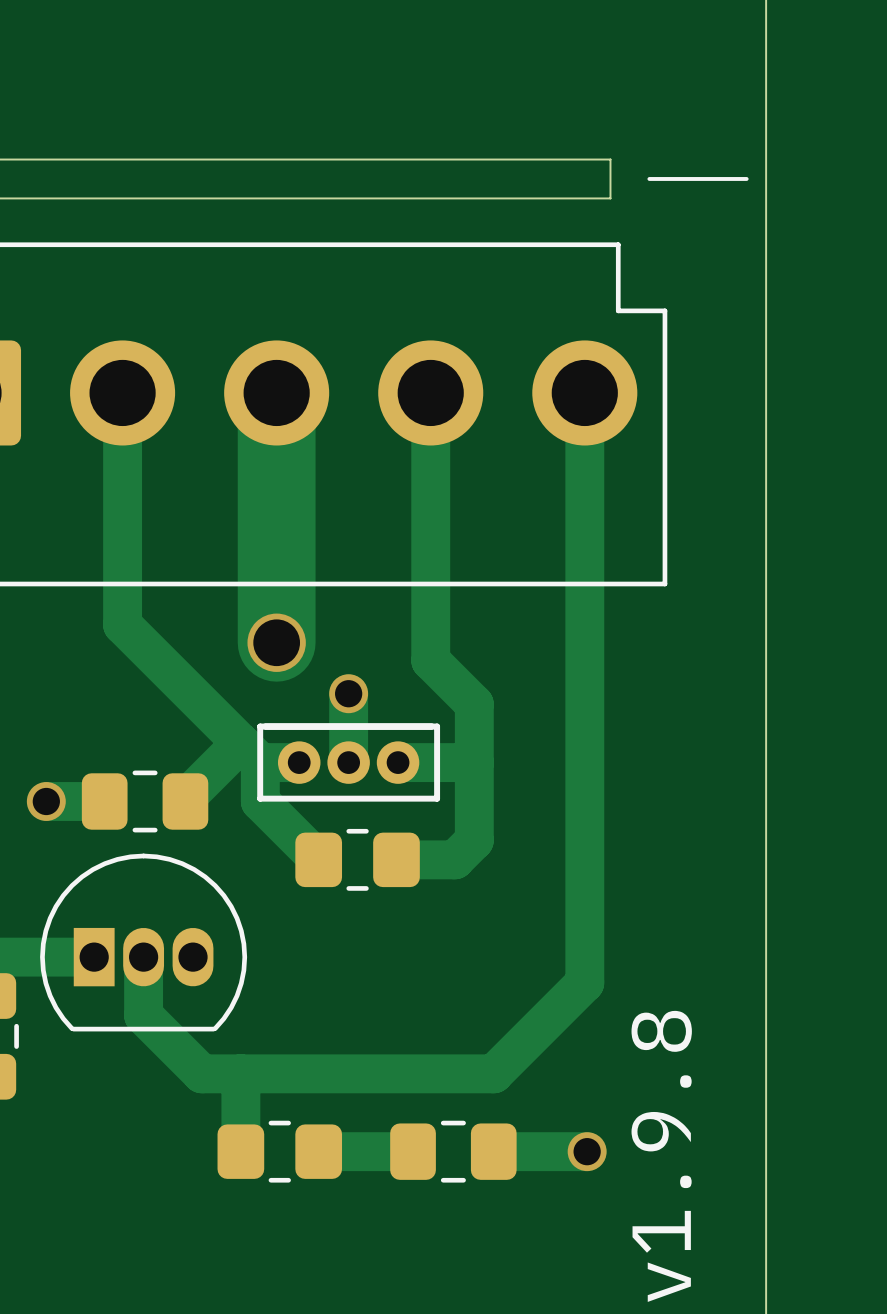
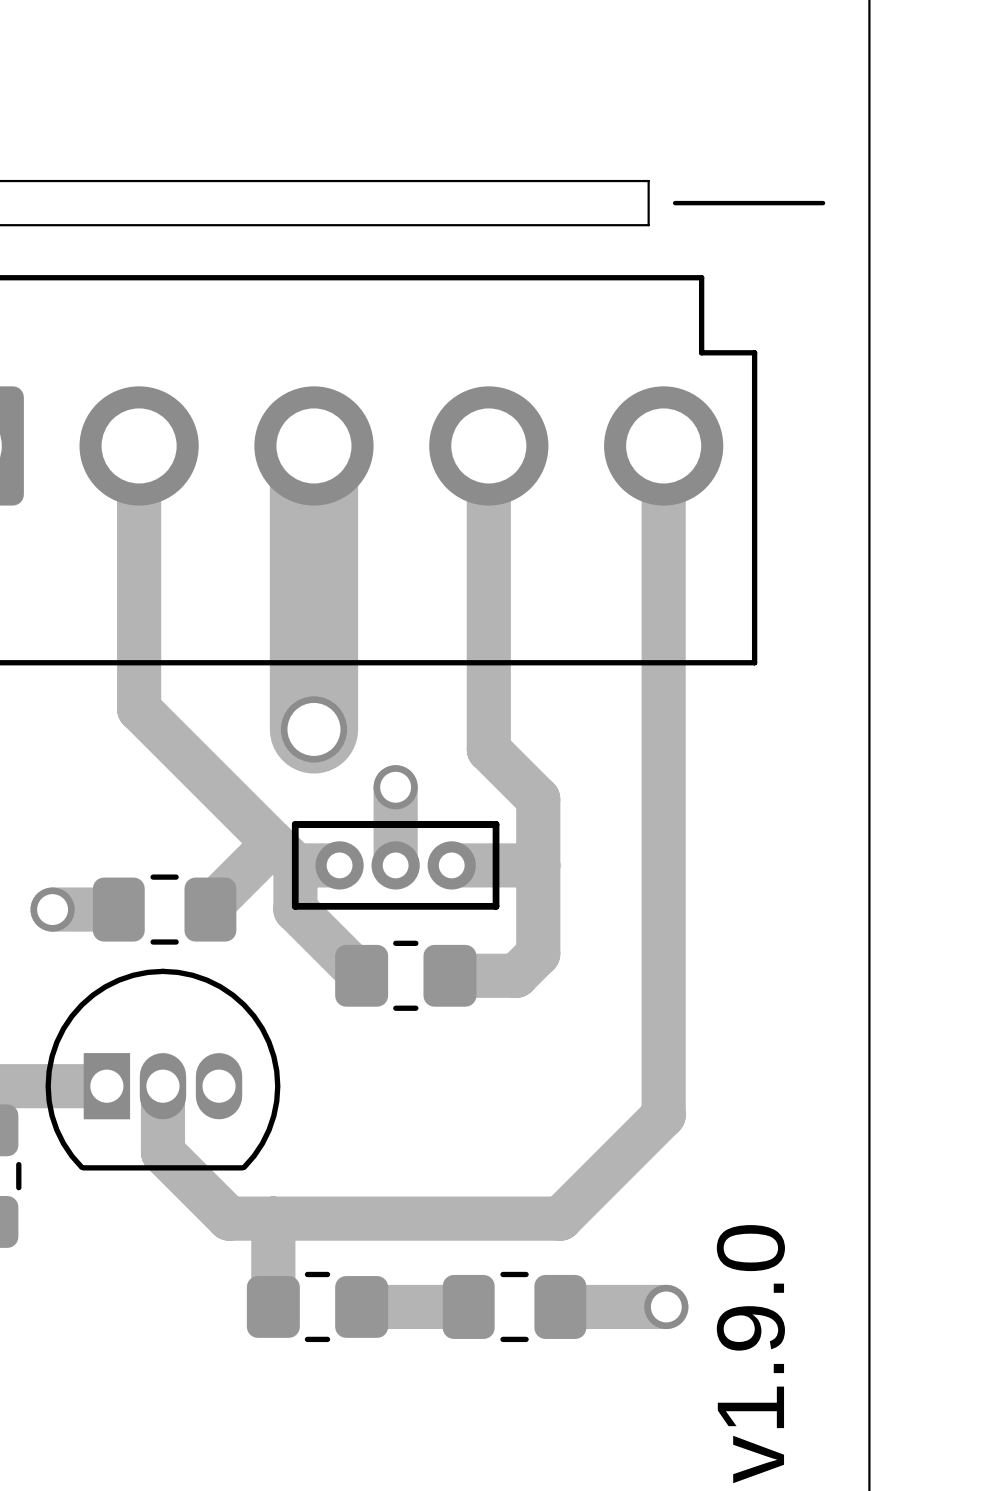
board edge: (571, 159) (610, 159) (610, 198) (571, 198) -> (648, 181) (648, 225)
line: none -> (675, 203) (736, 203)
line: (725, 178) (746, 178) -> none
text: v1.9.8 (661, 1156) -> v1.9.0 (750, 1354)

